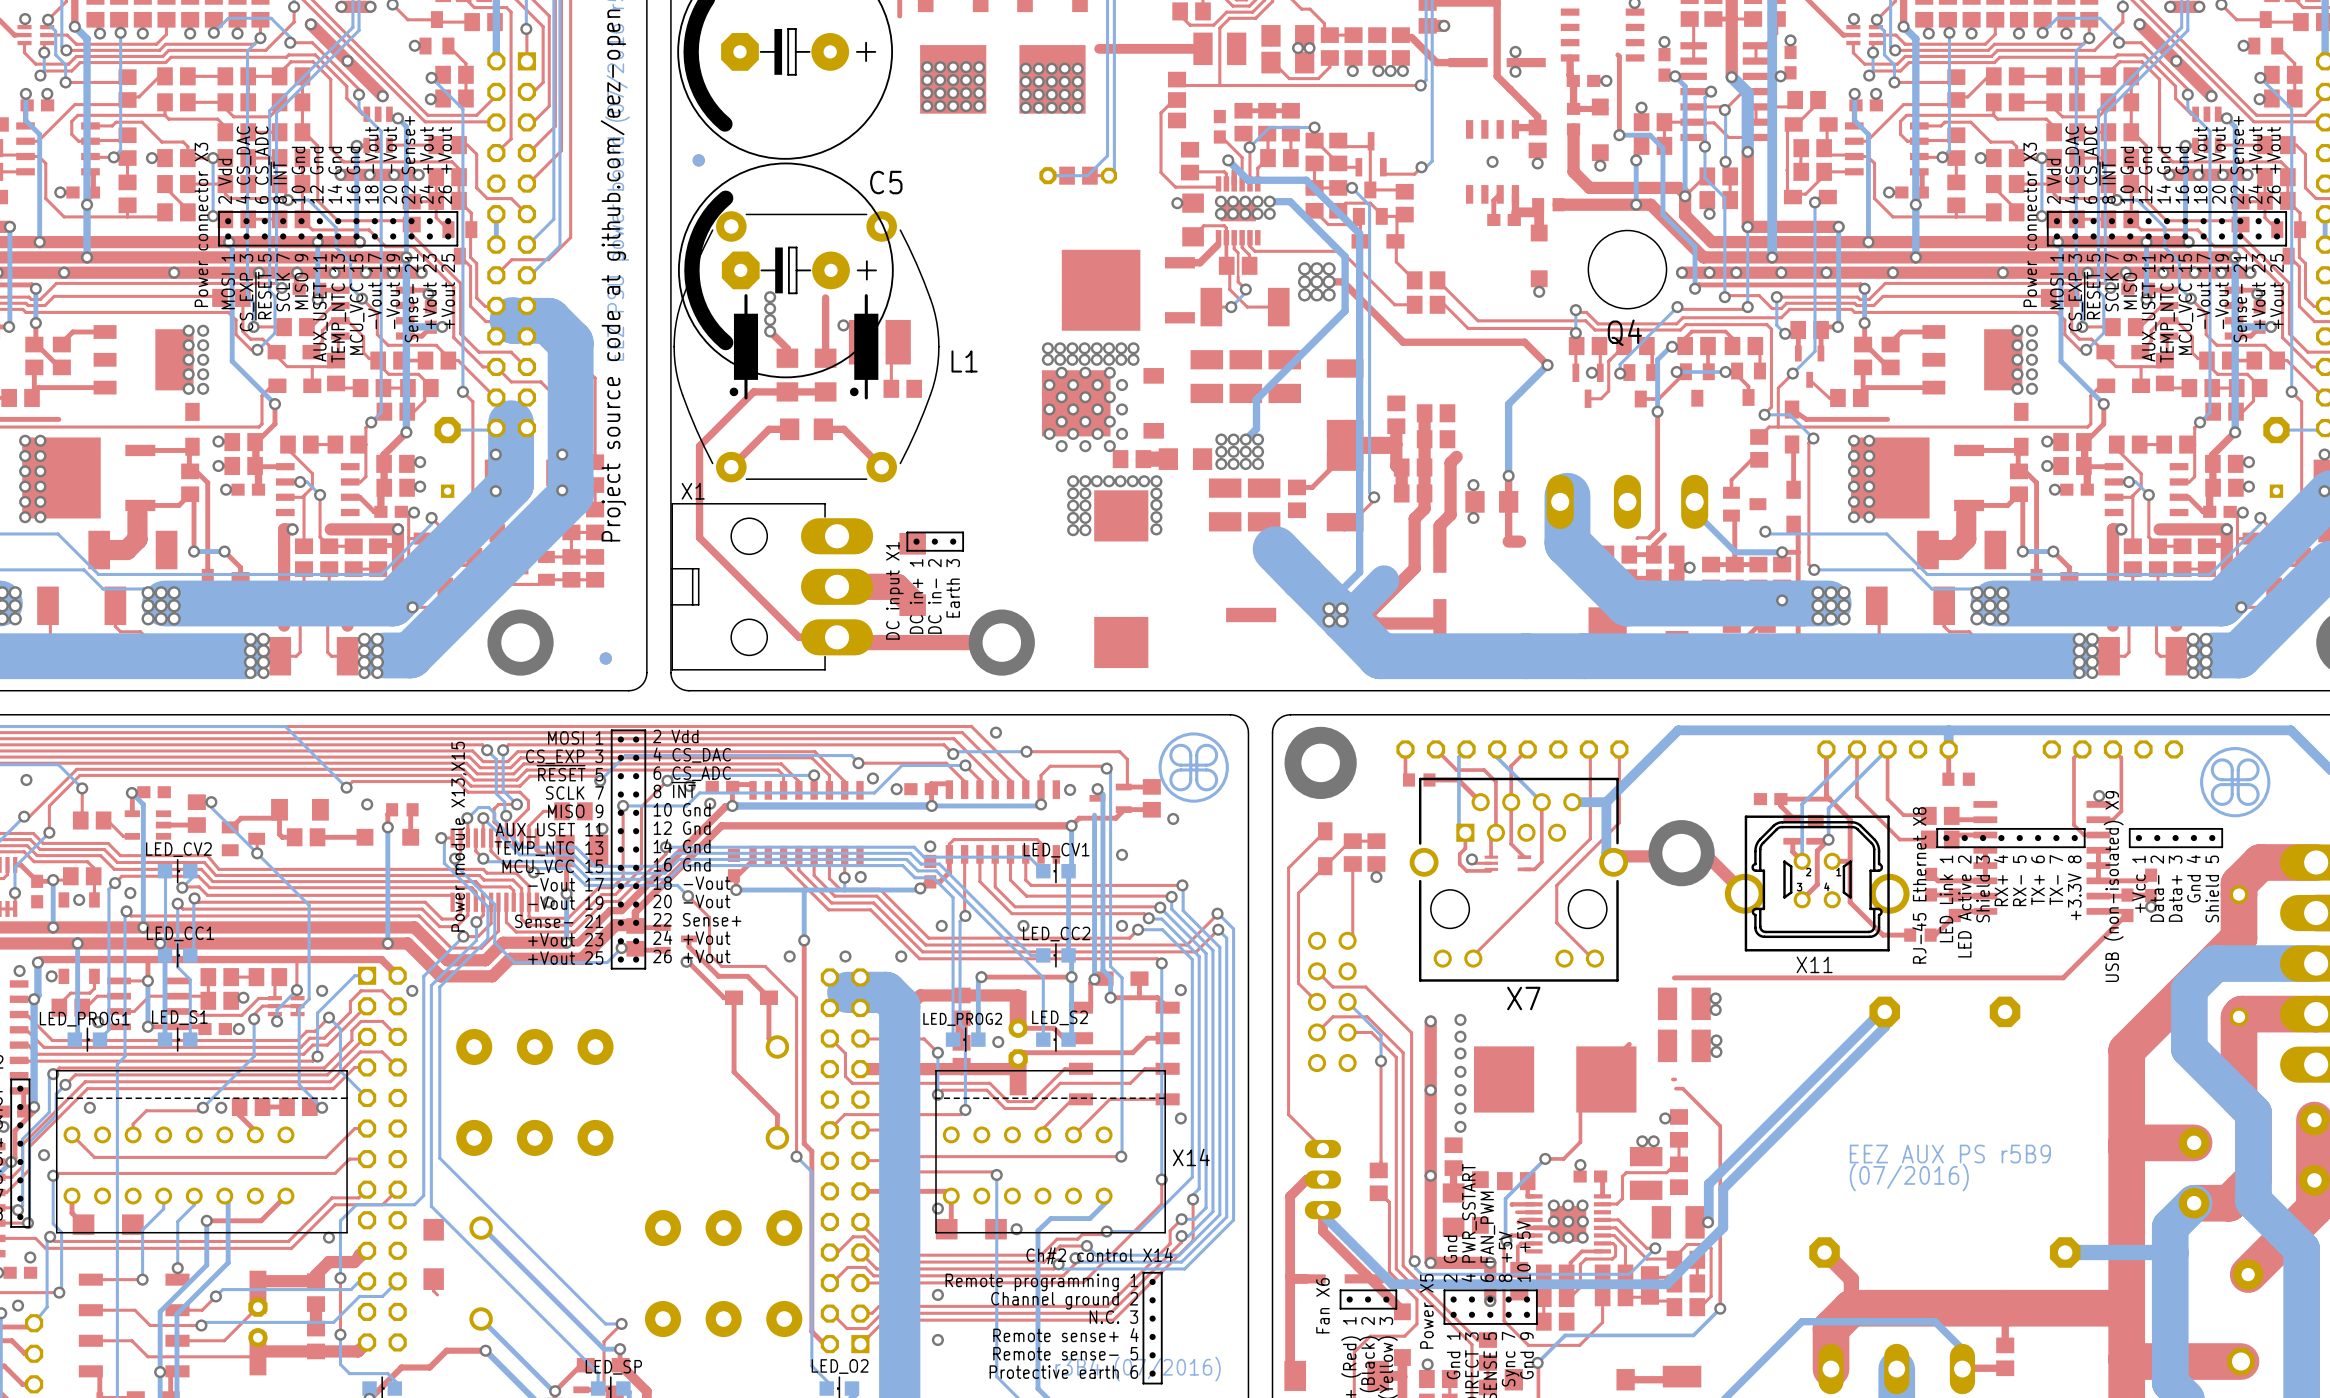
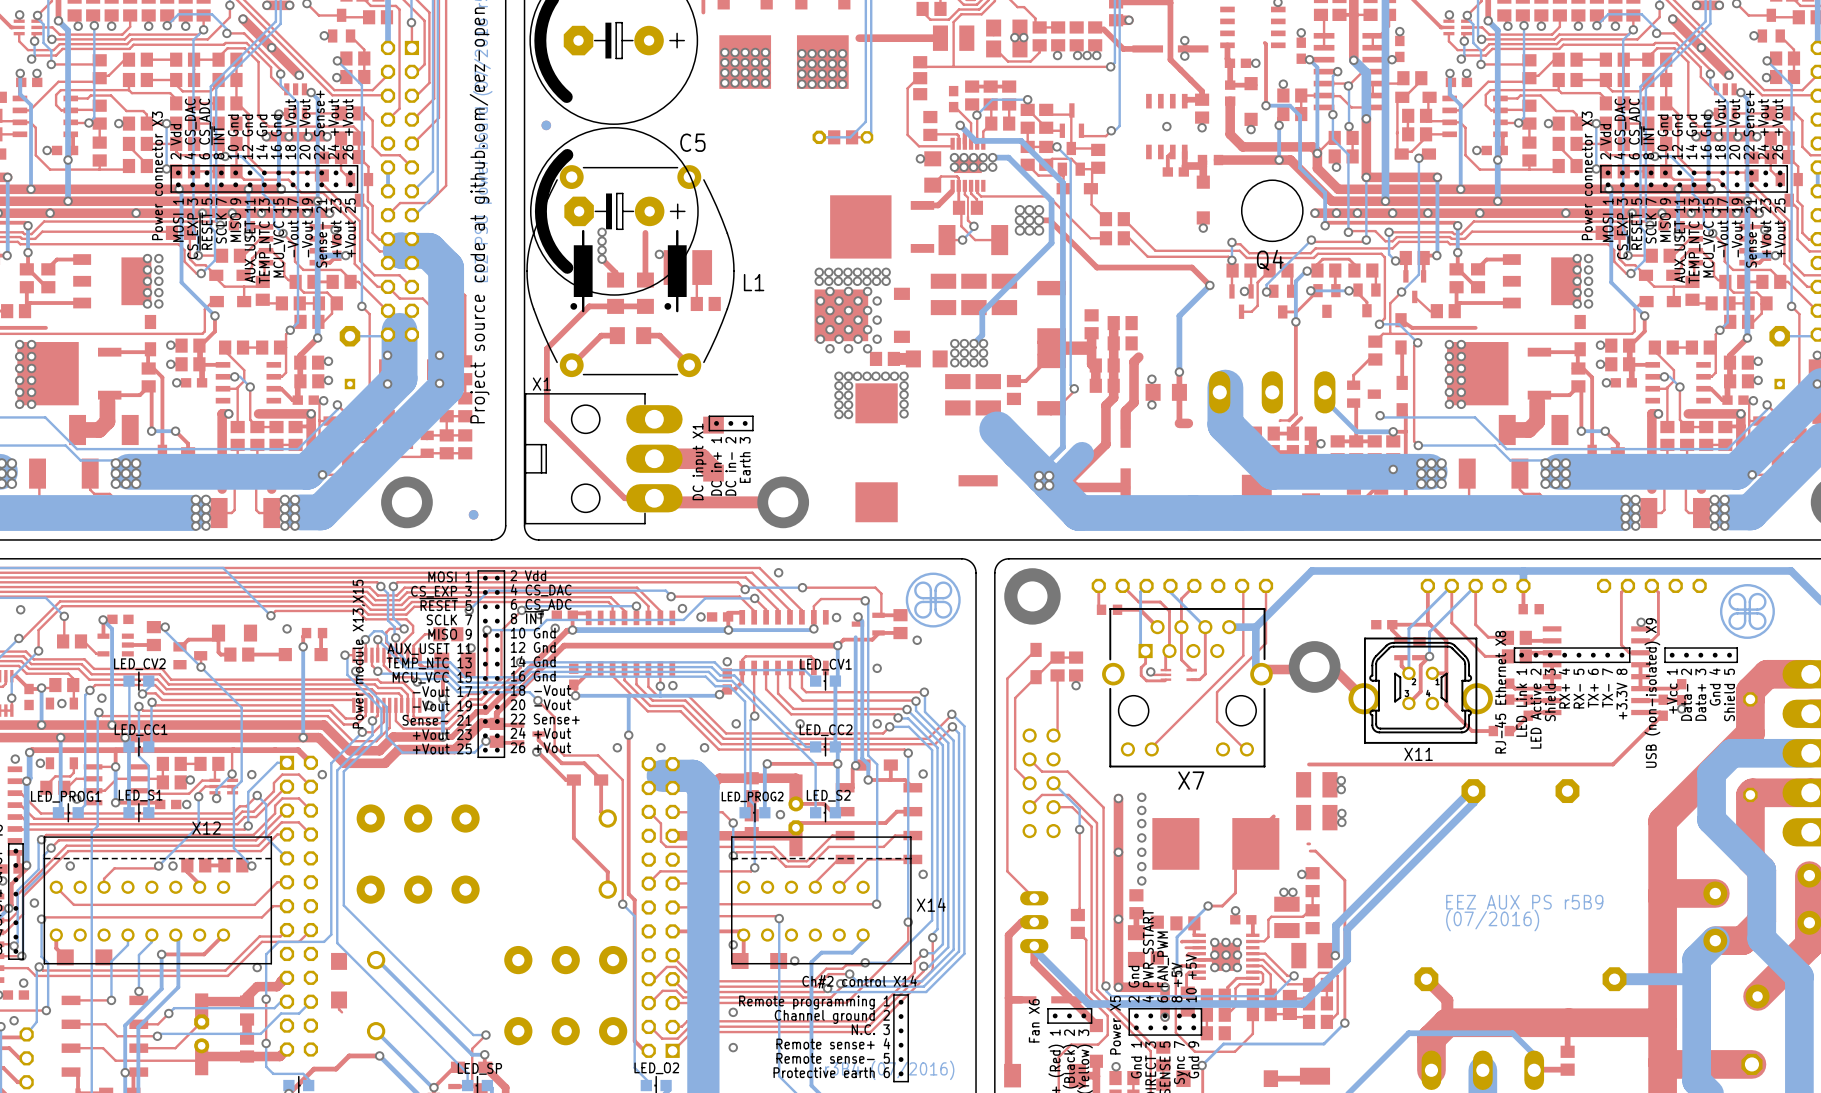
X12 name: none -> X12 (206, 828)

